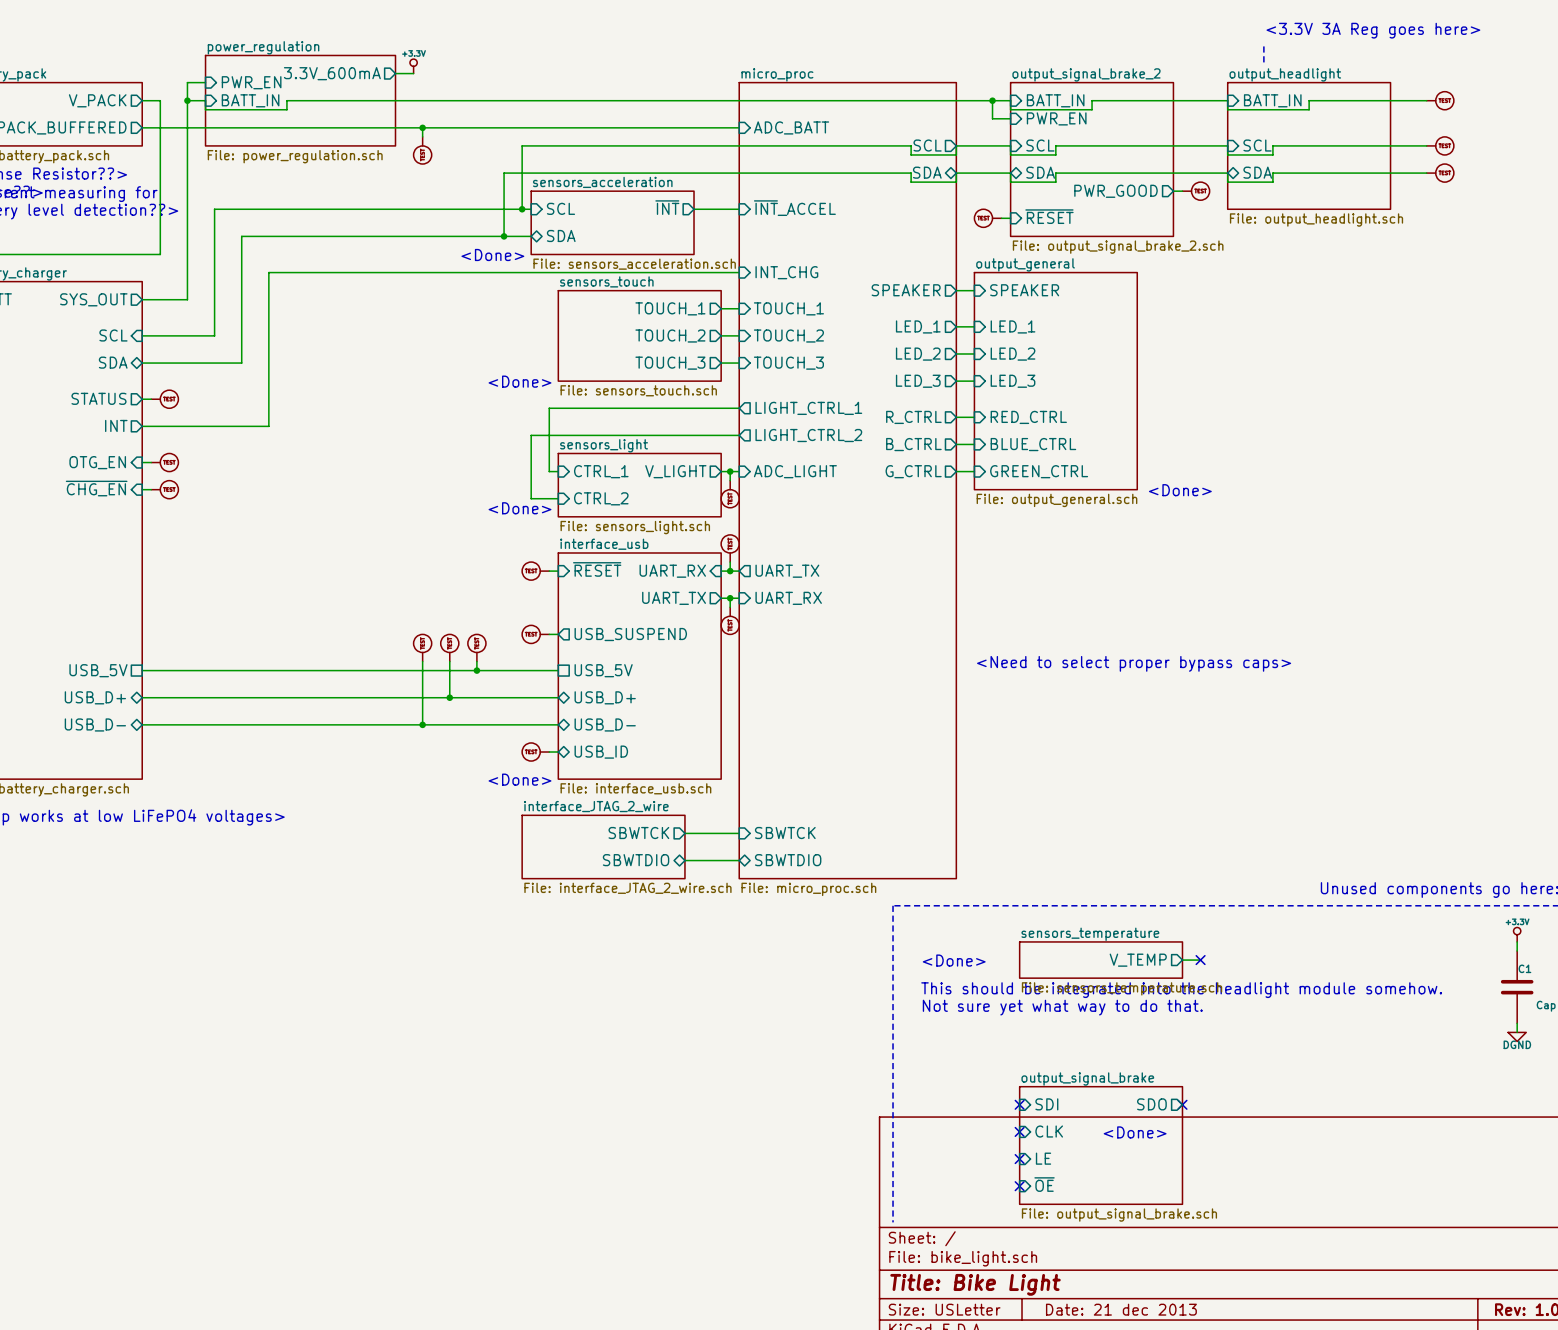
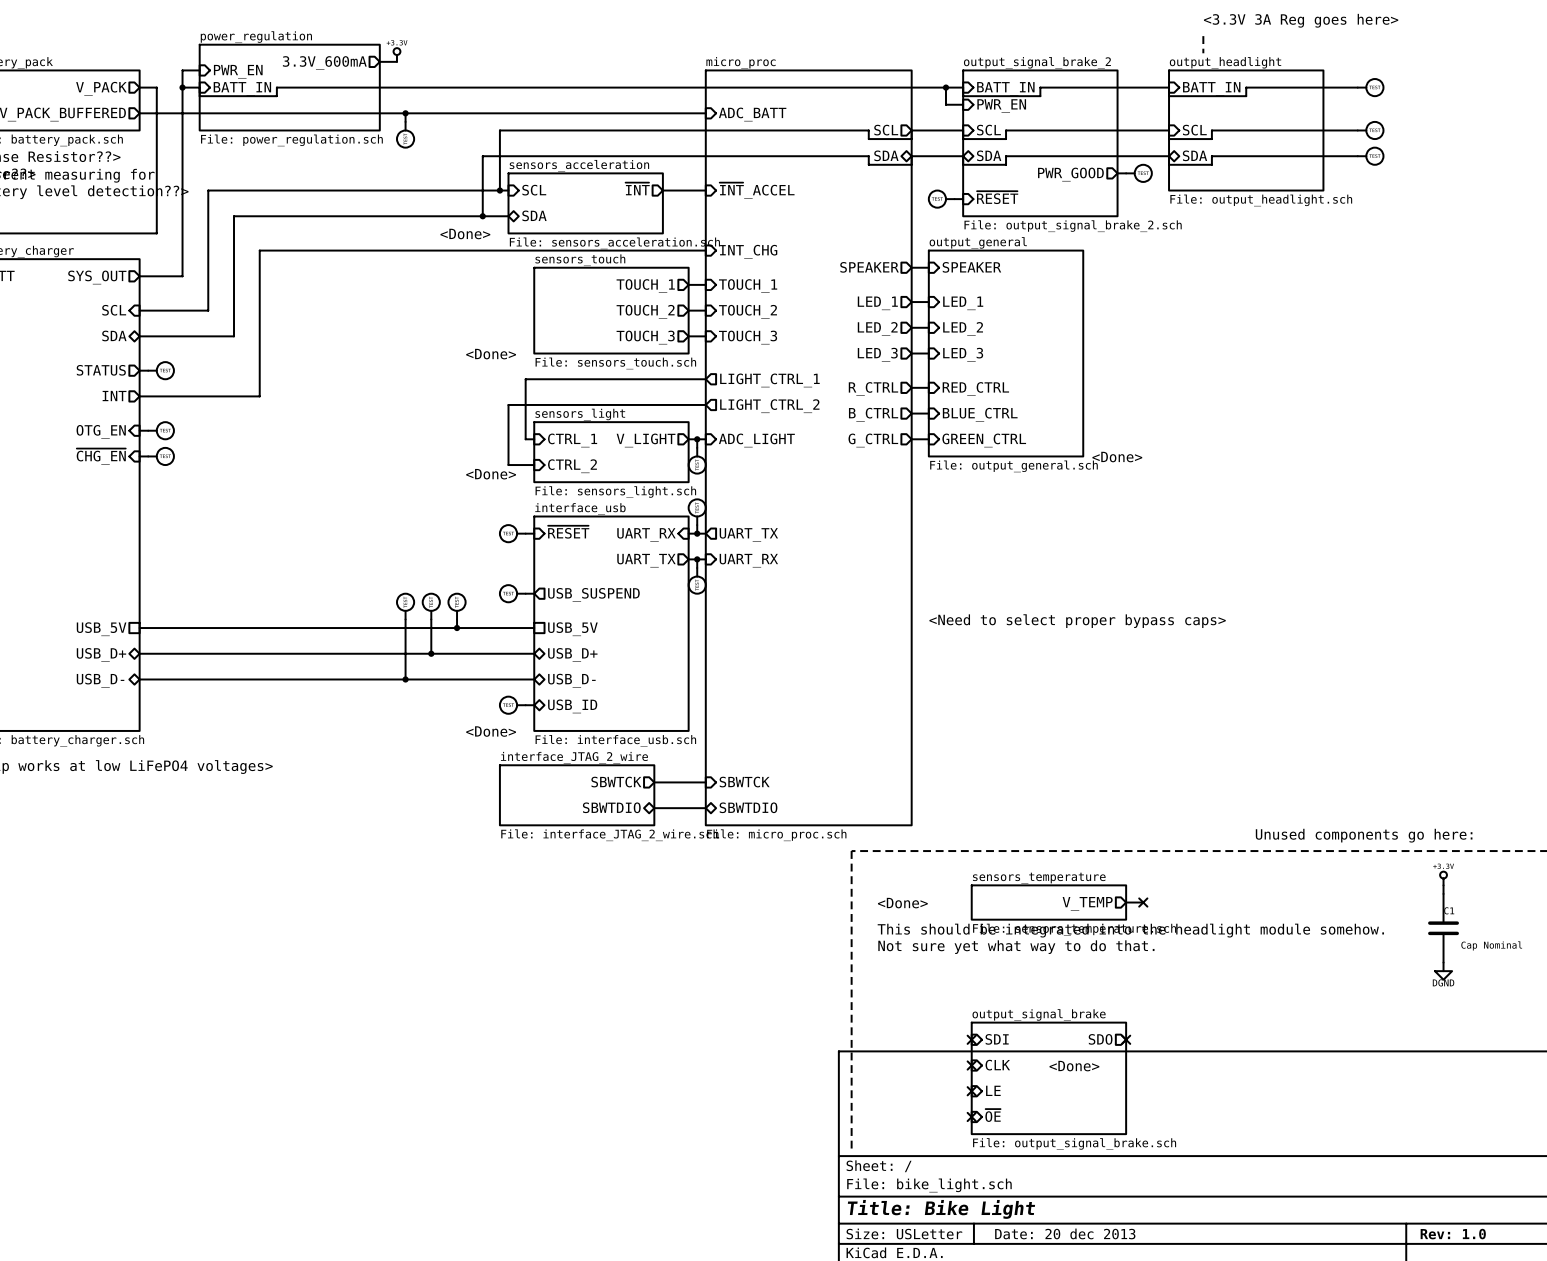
title block: Date: 21 dec 2013 (1121, 1309) -> Date: 20 dec 2013 (1065, 1233)

